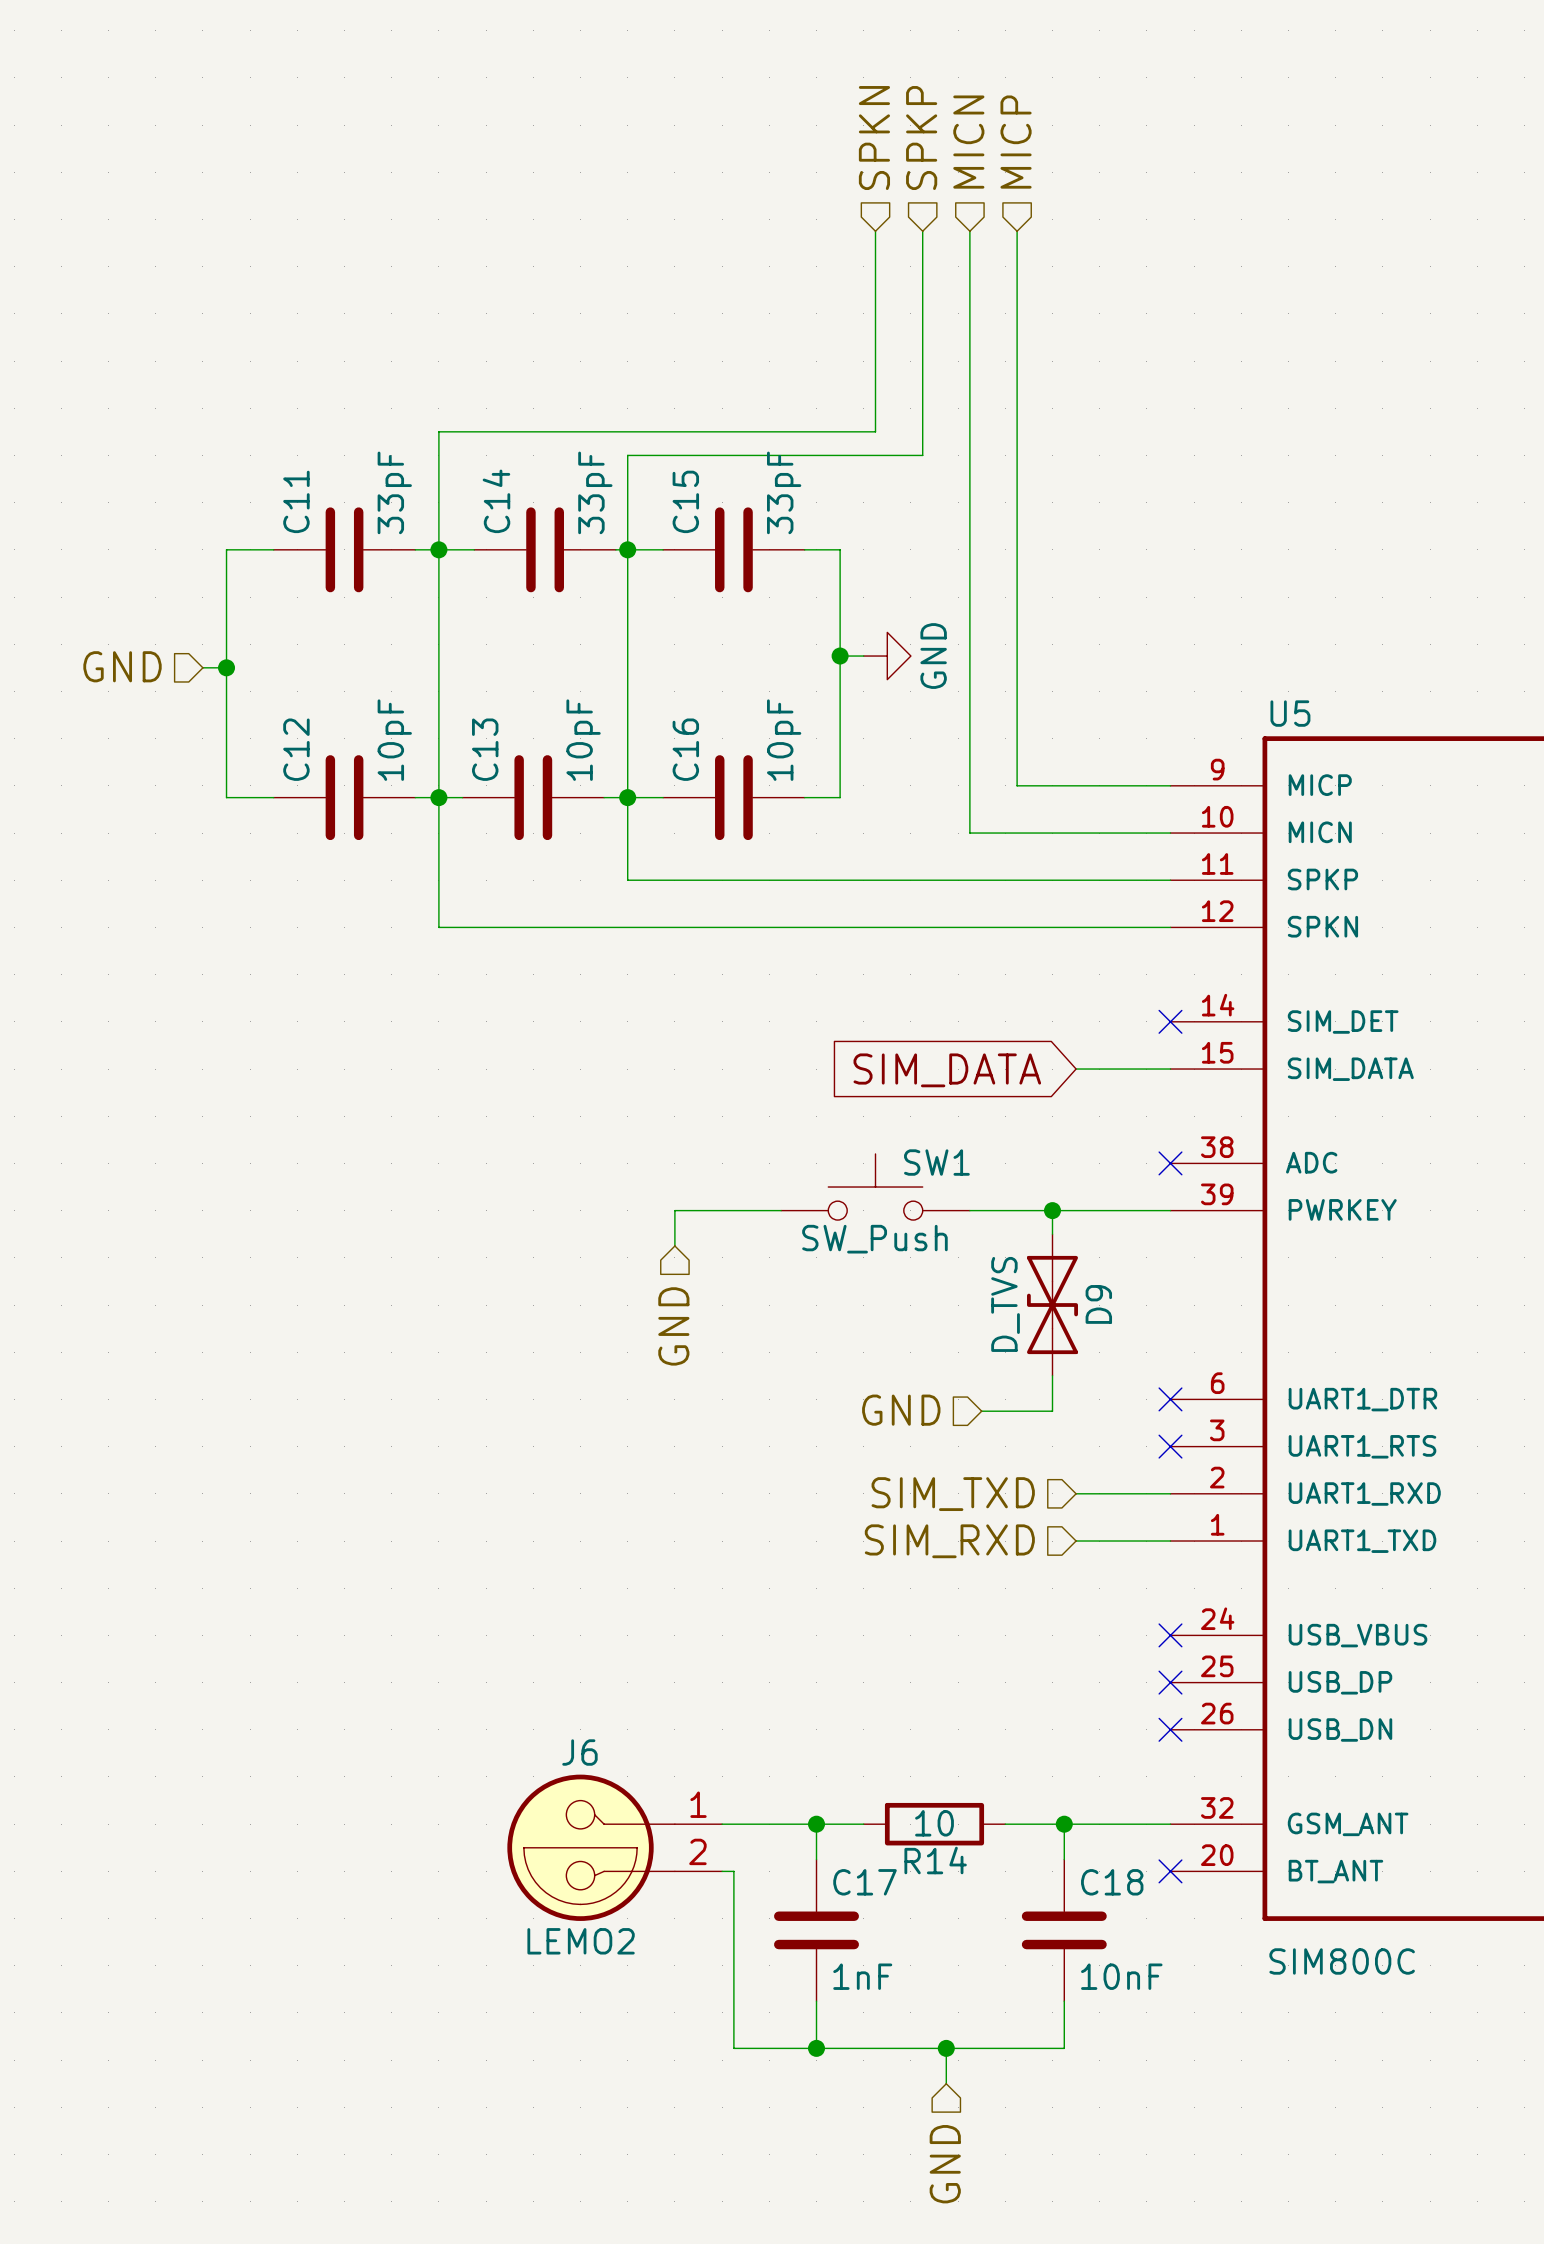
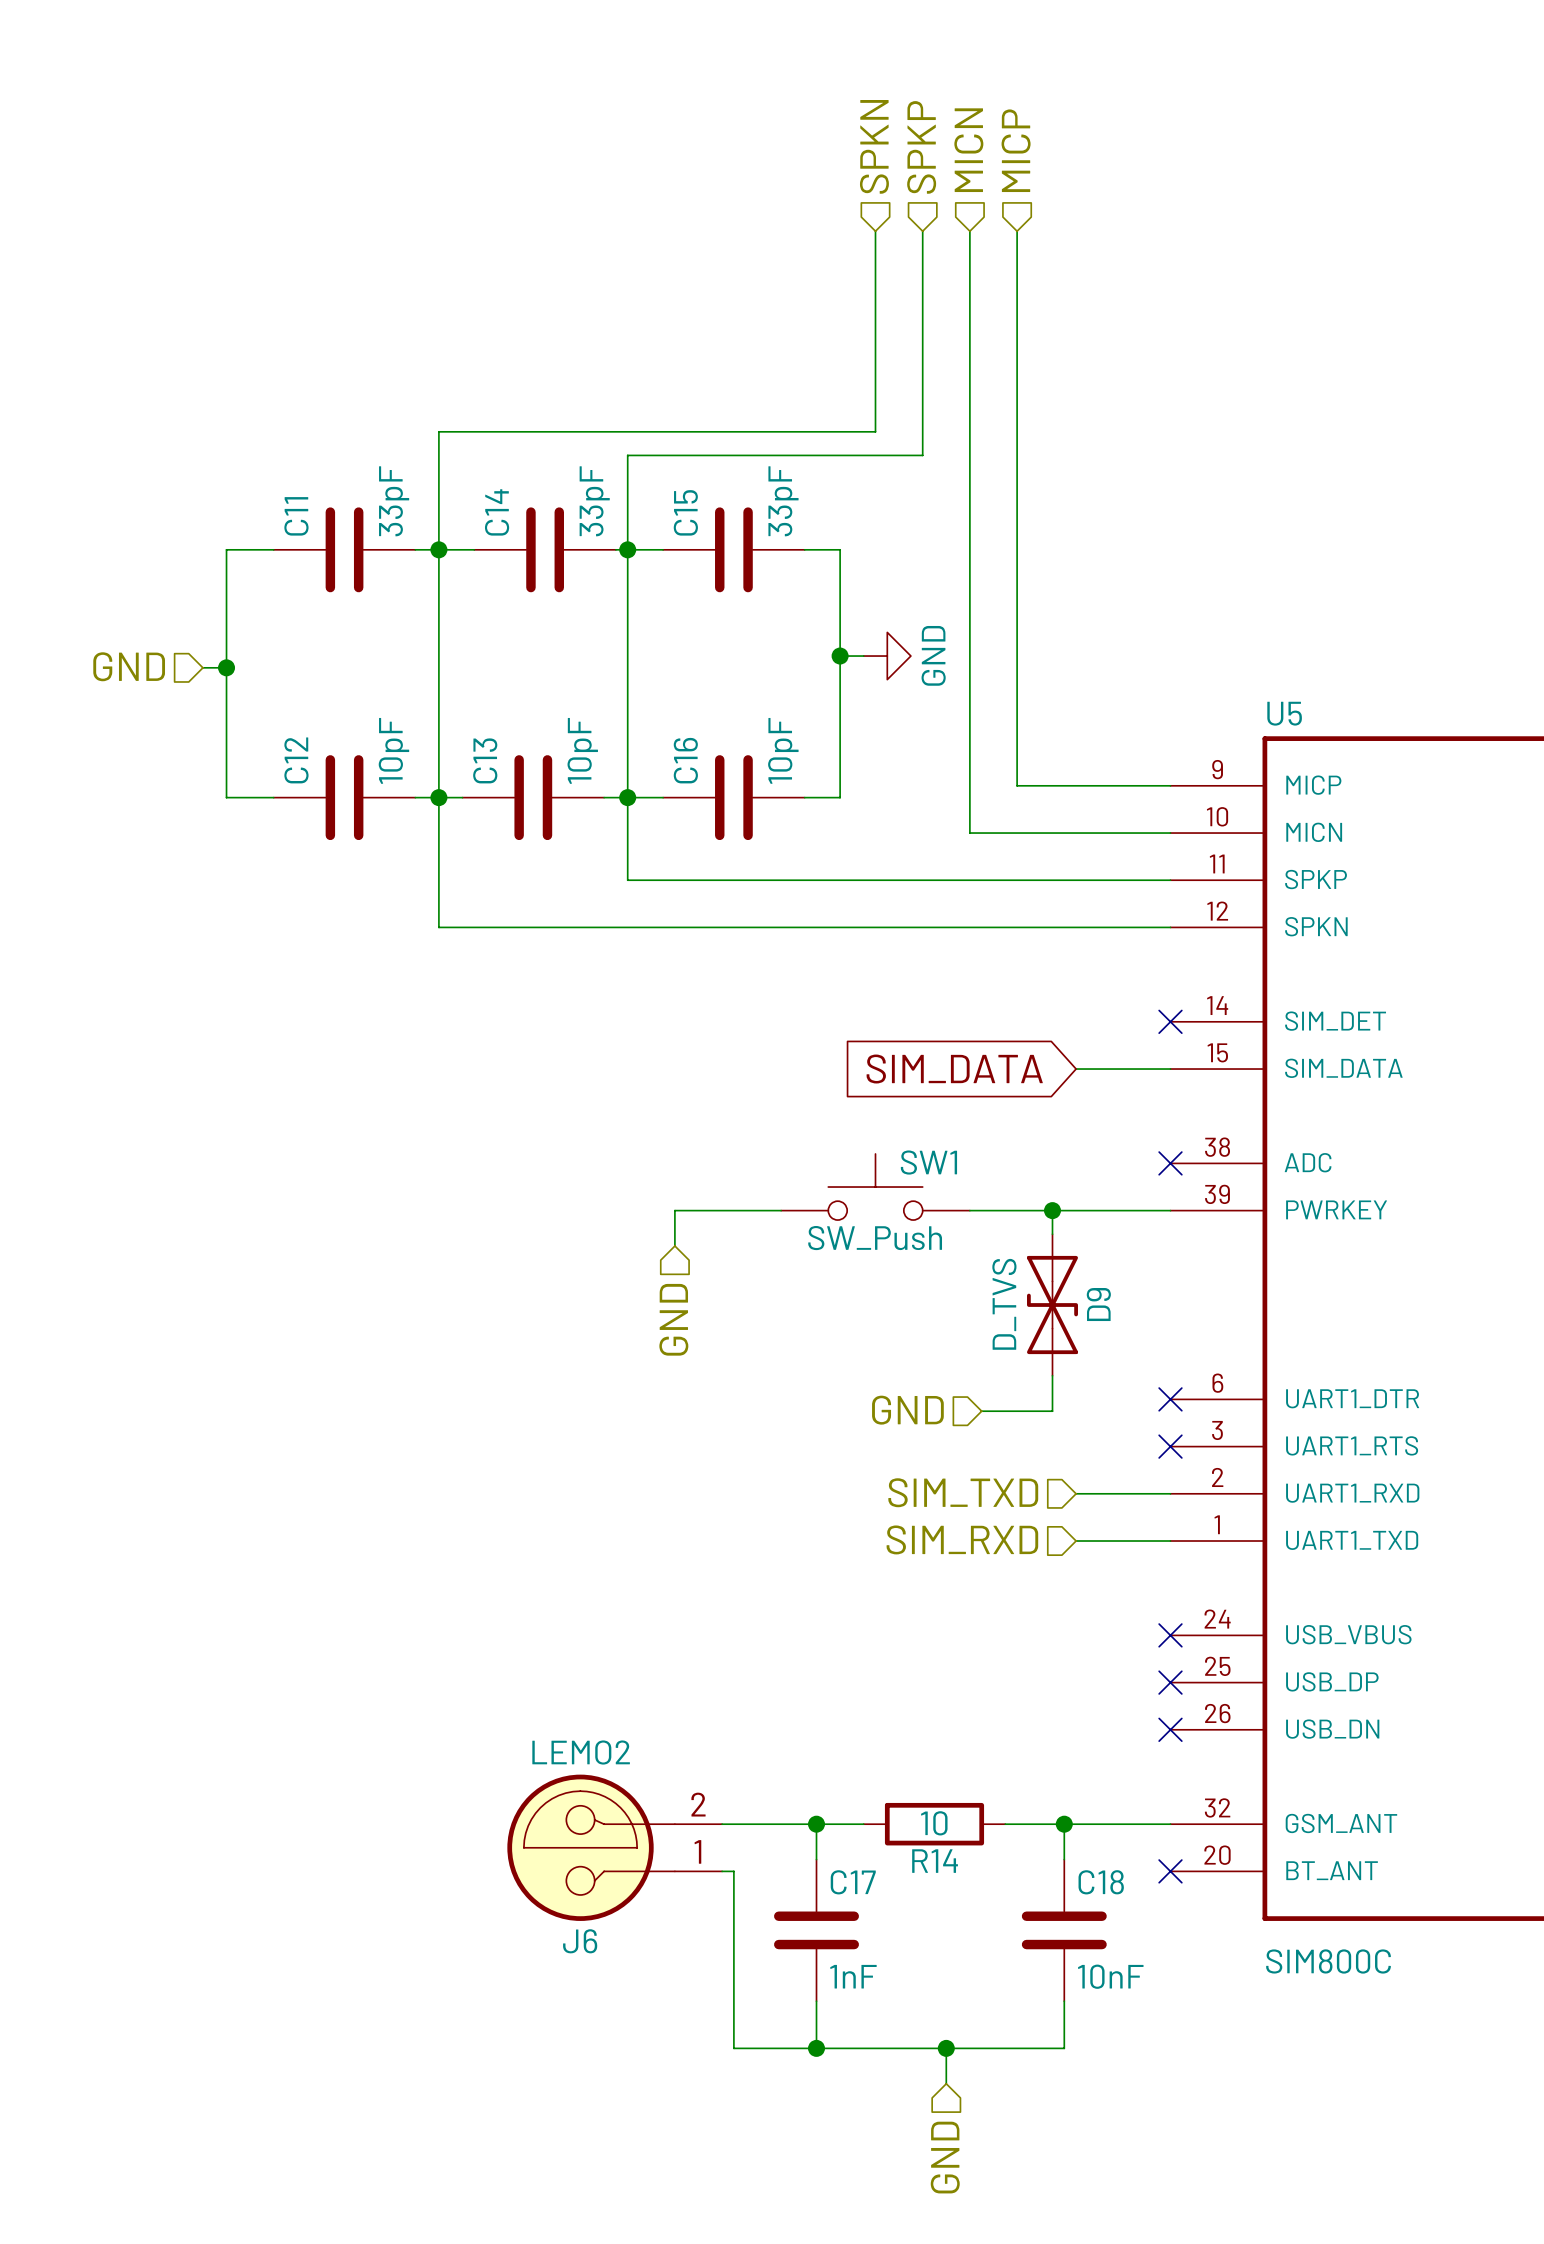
J6 flip: as is (591, 1847) -> up-down (591, 1847)

